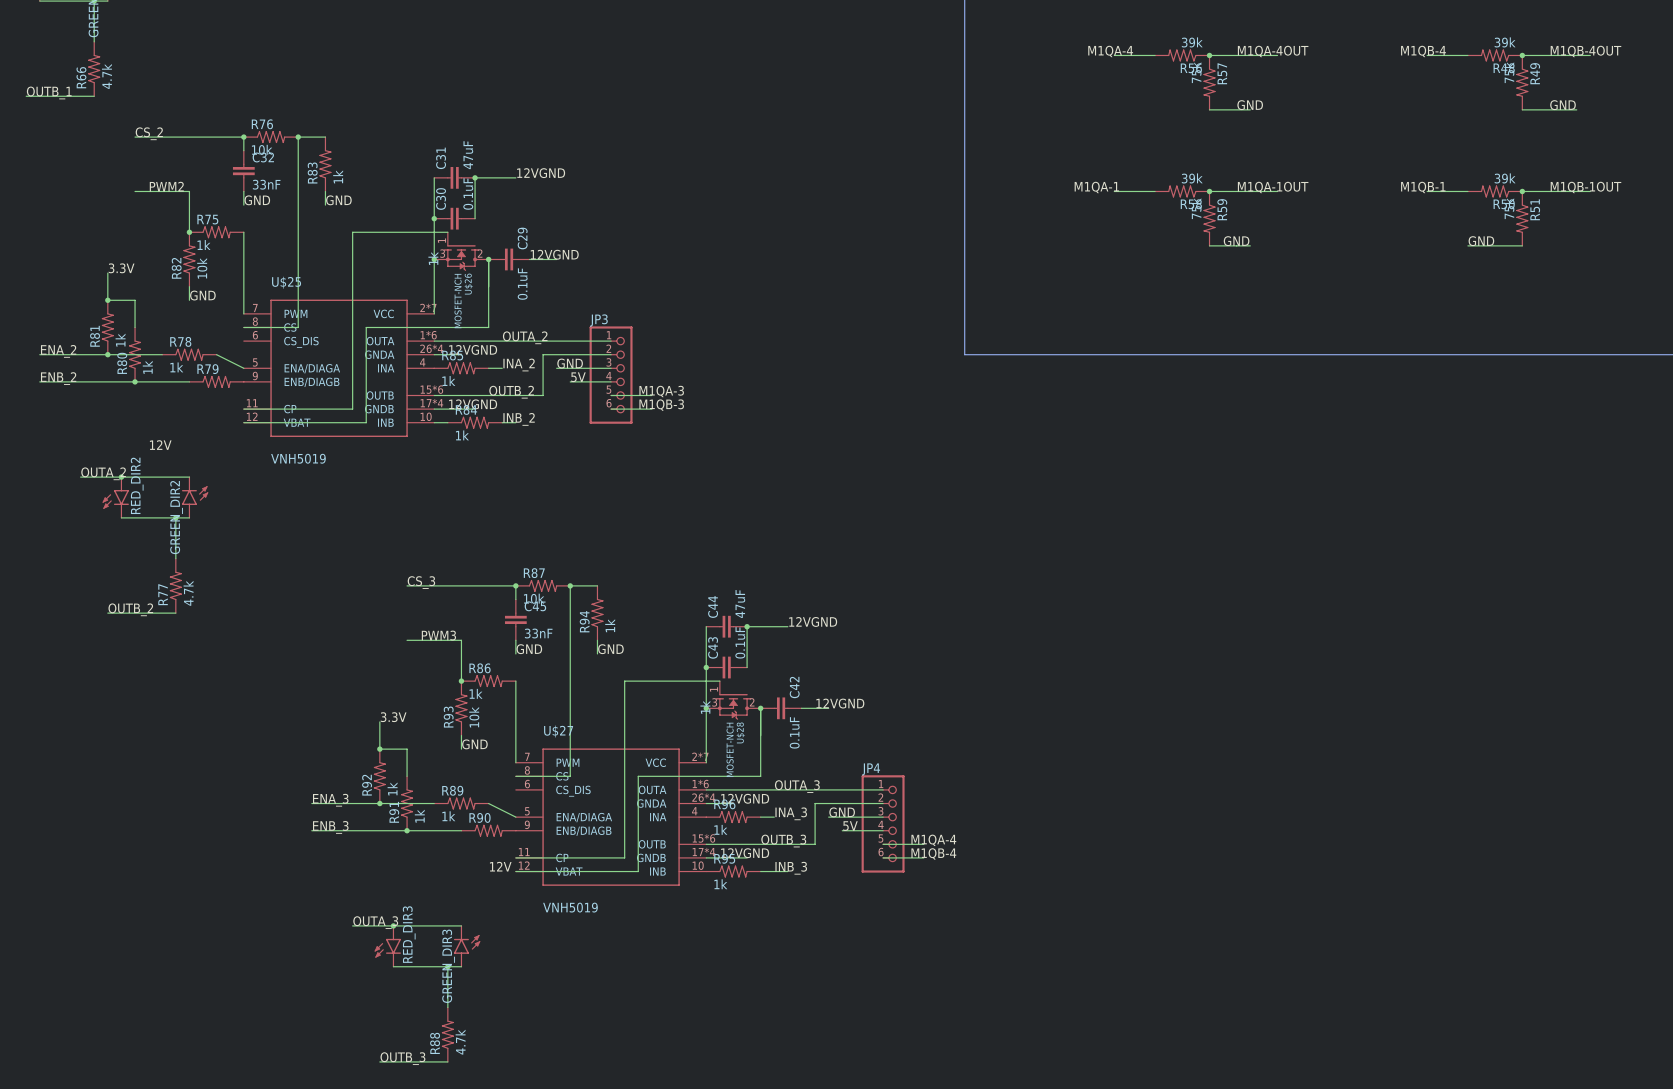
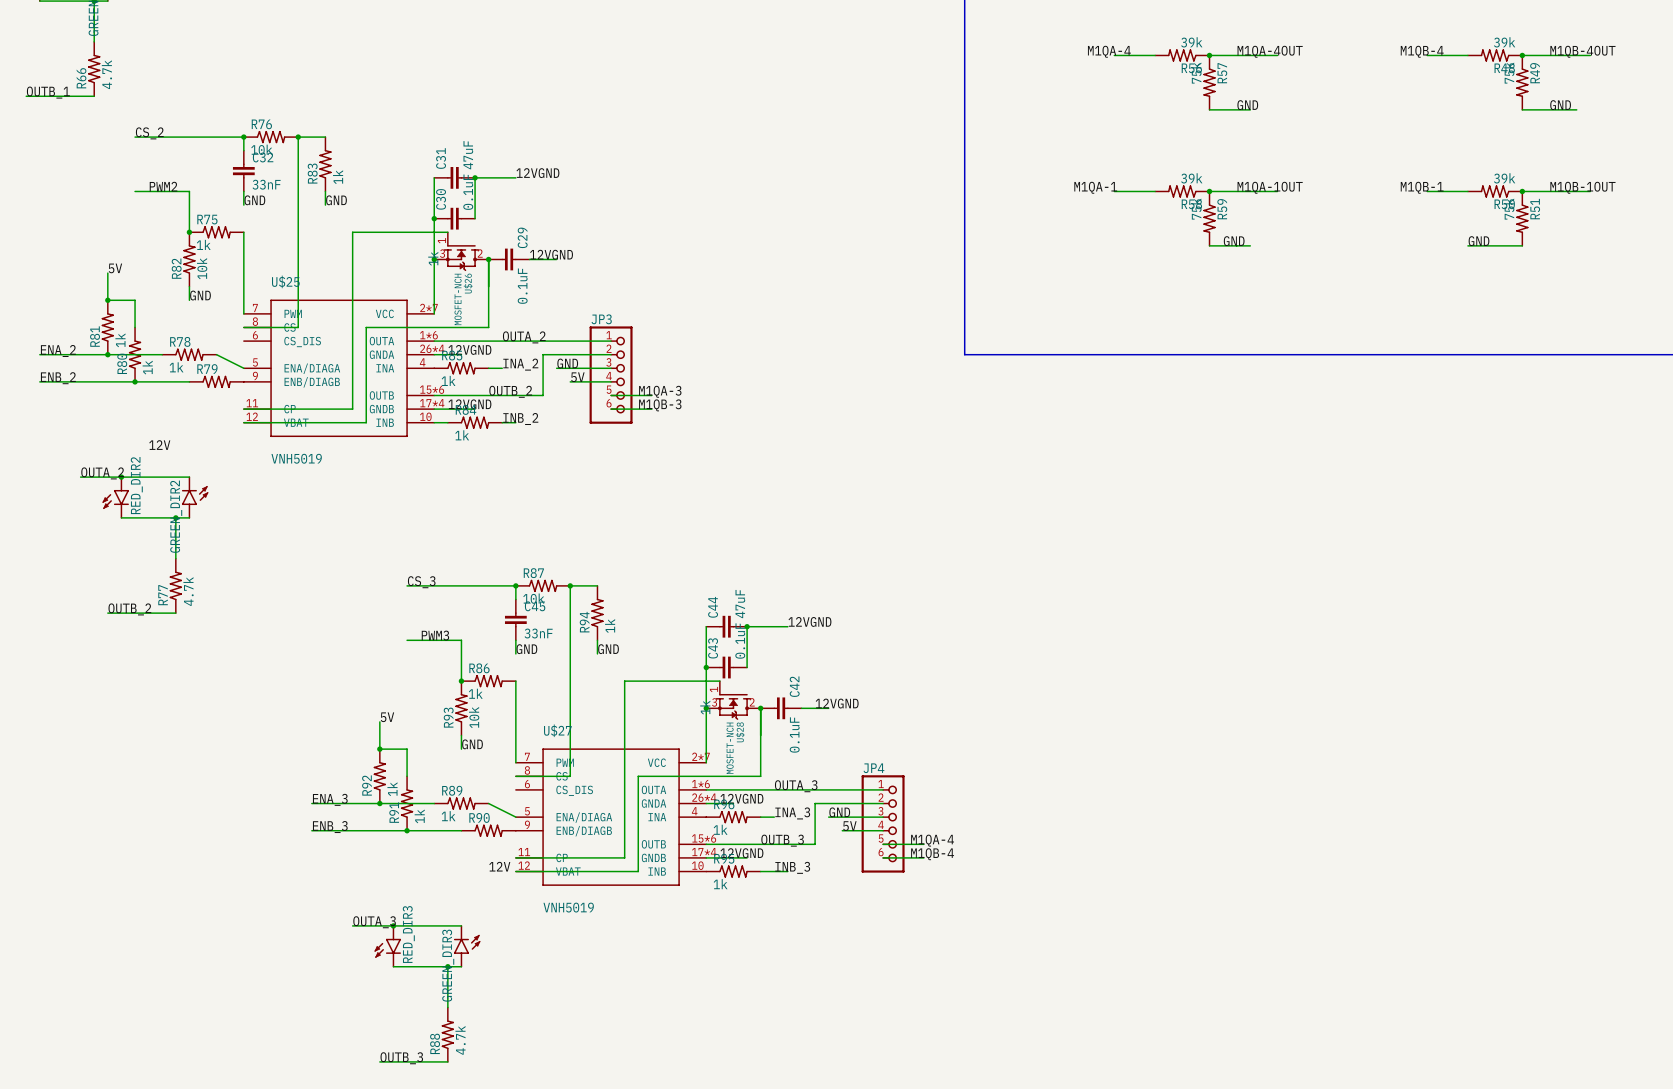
label: 3.3V (121, 268) -> 5V (115, 268)
label: 3.3V (393, 717) -> 5V (387, 717)

